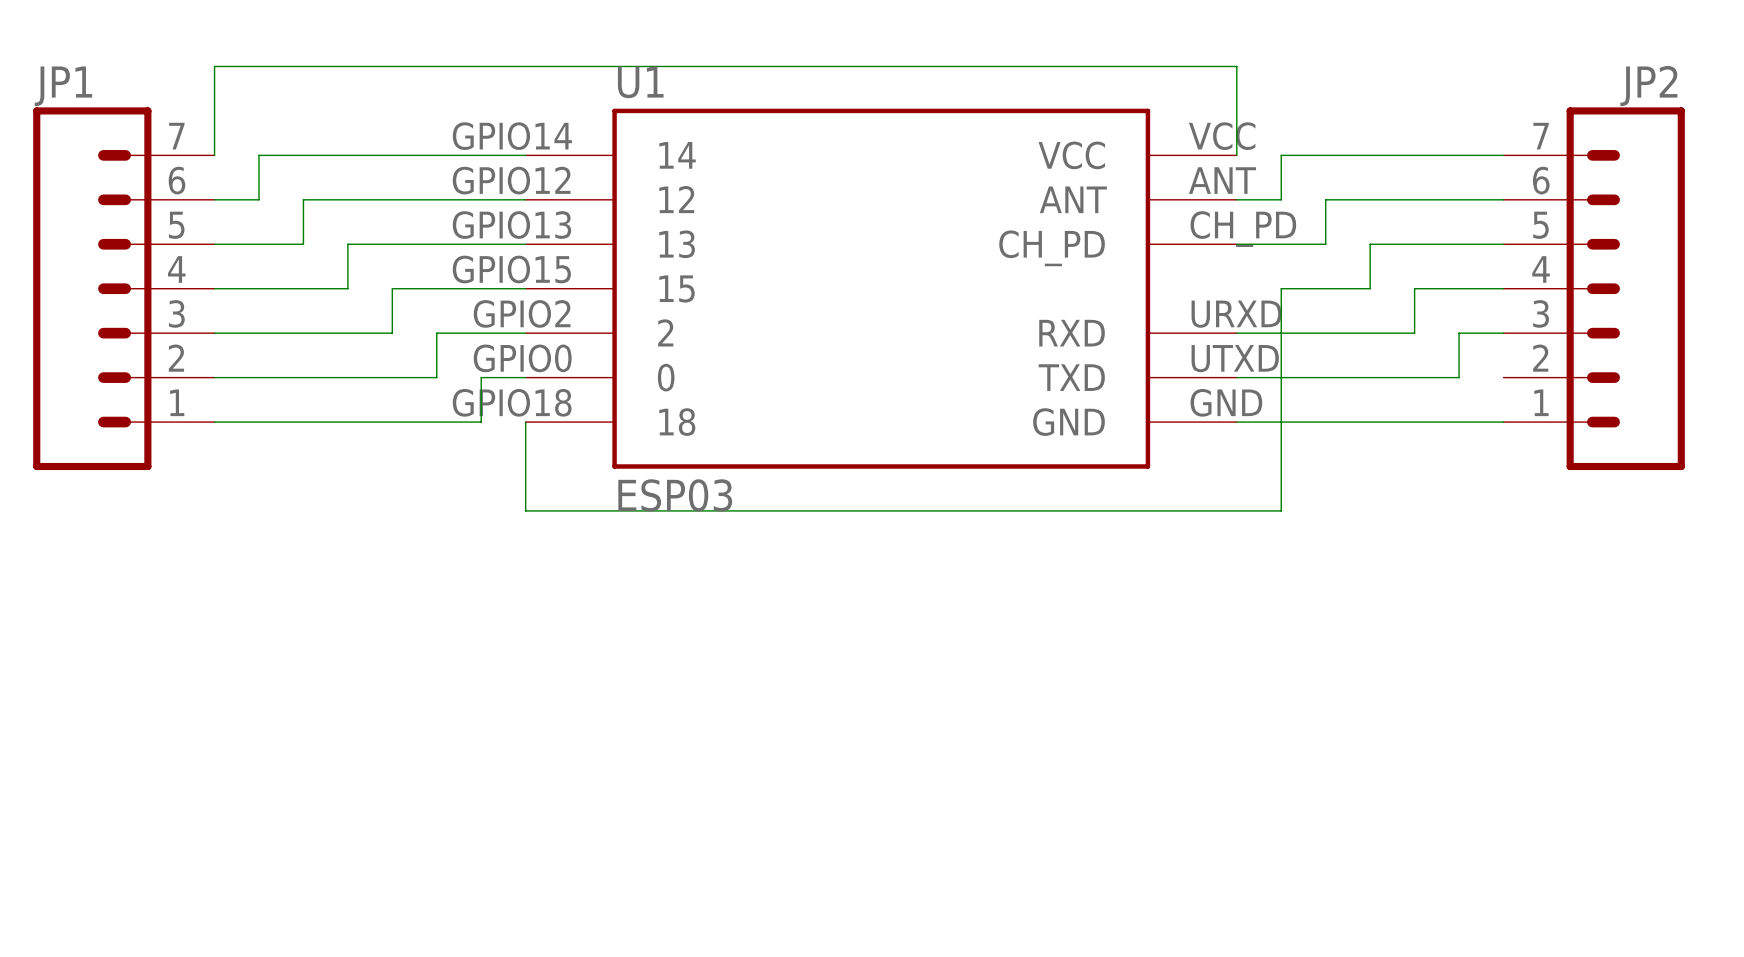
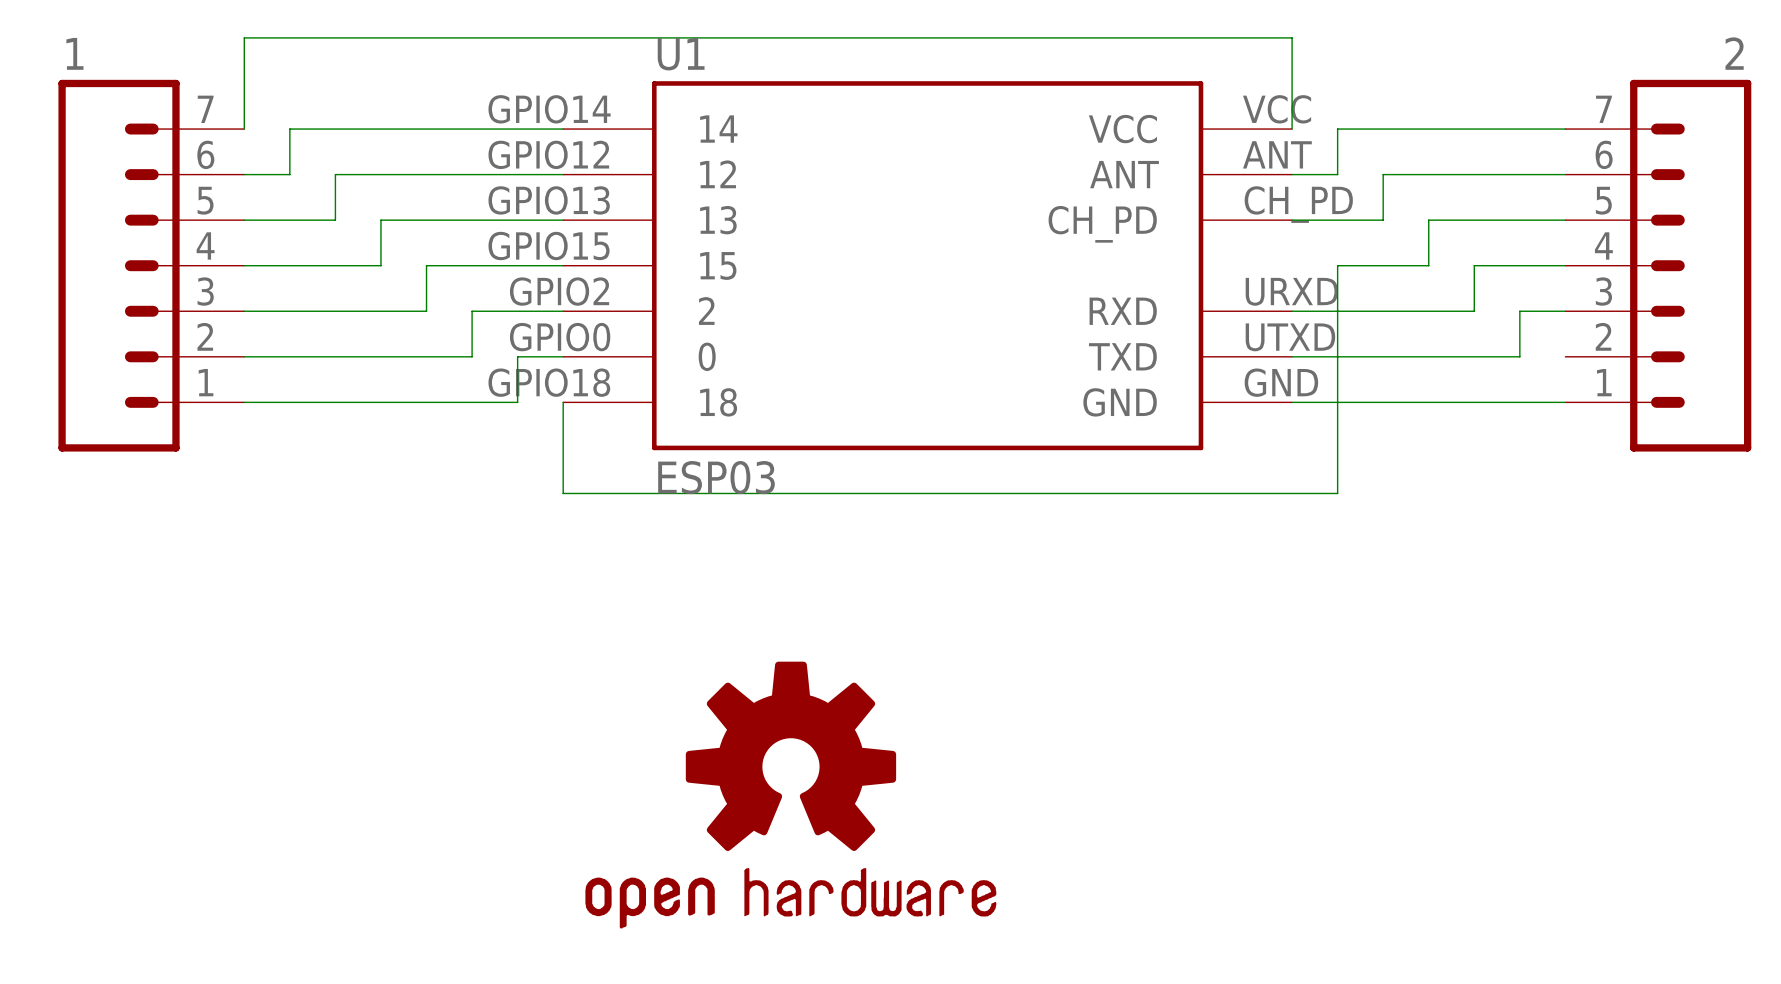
JP1 name: JP1 (63, 86) -> 1 (74, 53)
JP2 name: JP2 (1648, 86) -> 2 (1734, 53)
part: none -> (790, 795)

